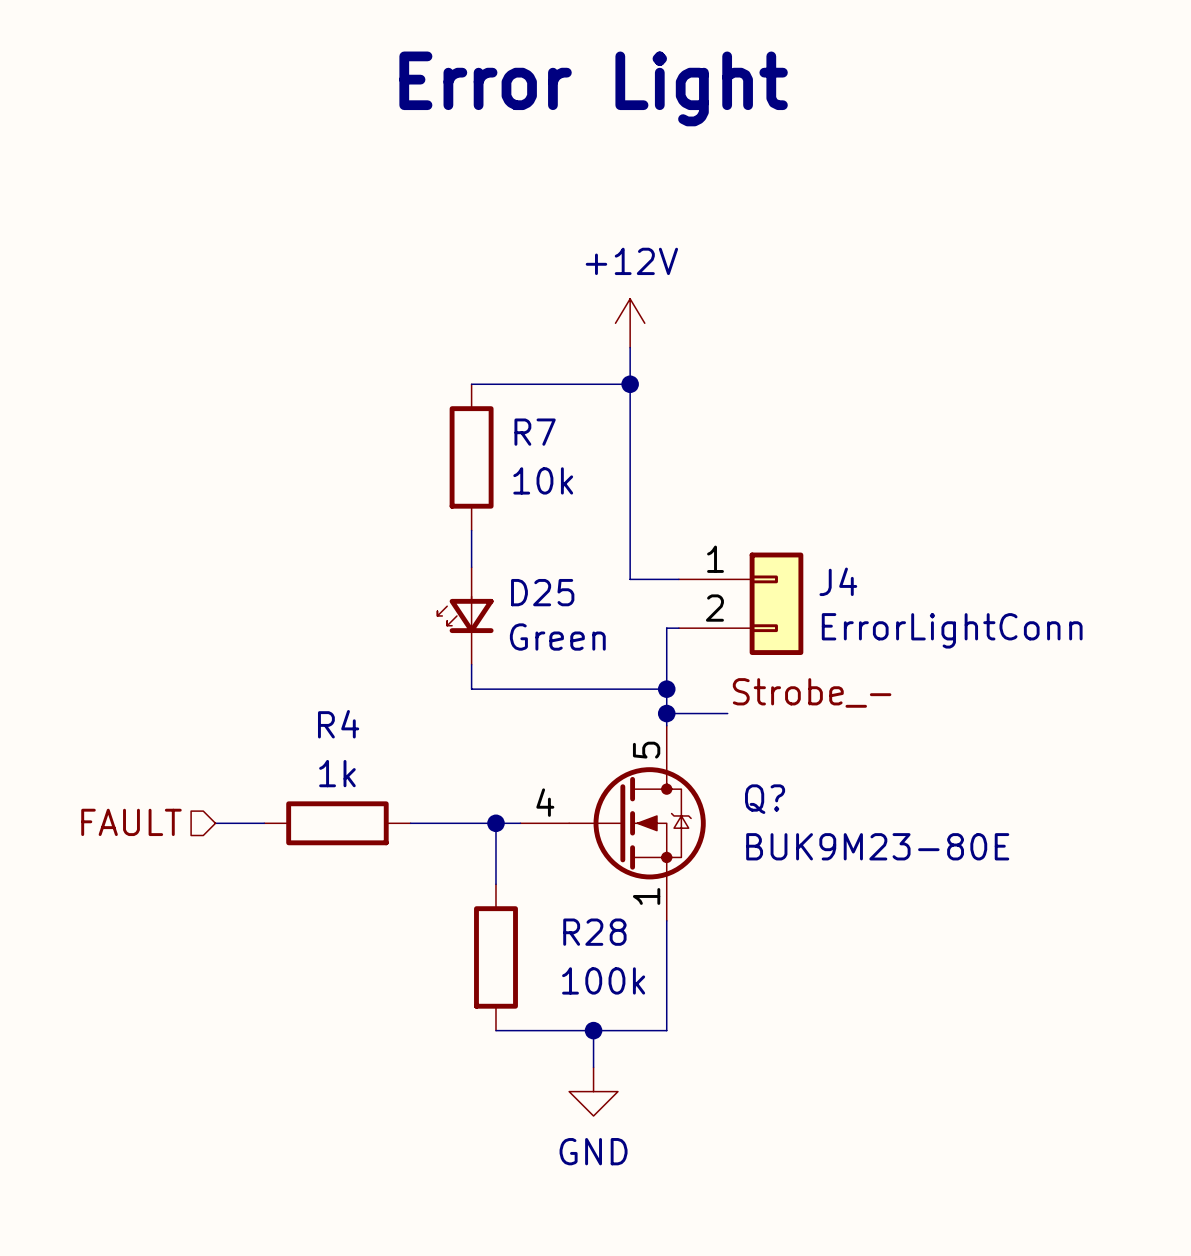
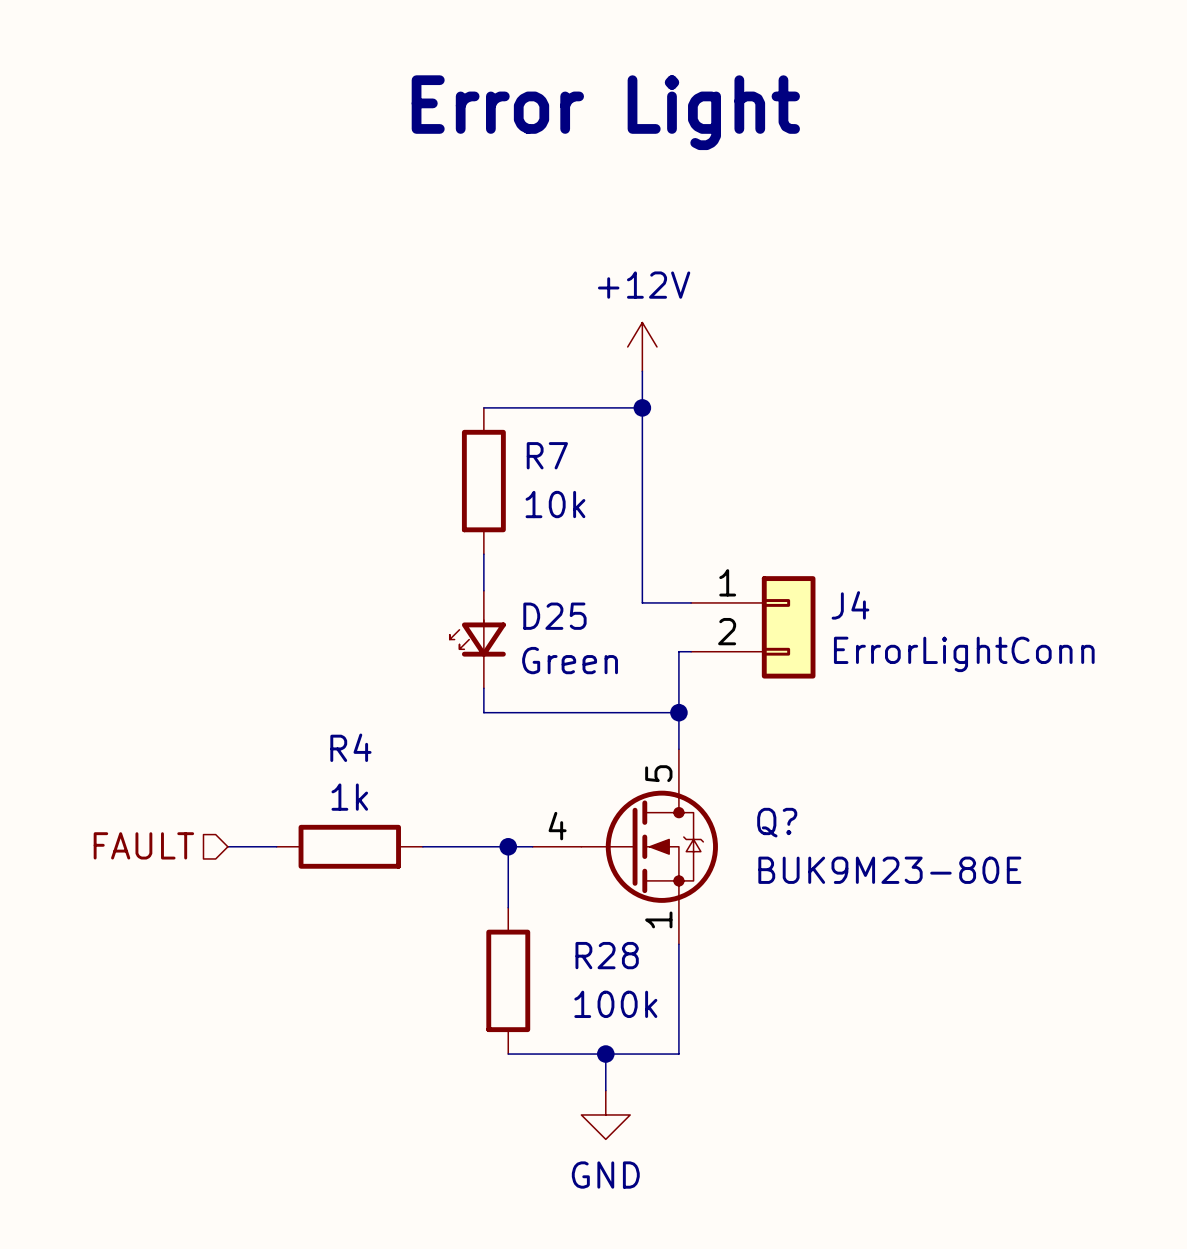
label: Strobe_- (812, 692) -> none
wire: (666, 713) (727, 713) -> none
junction: (666, 713) -> none

